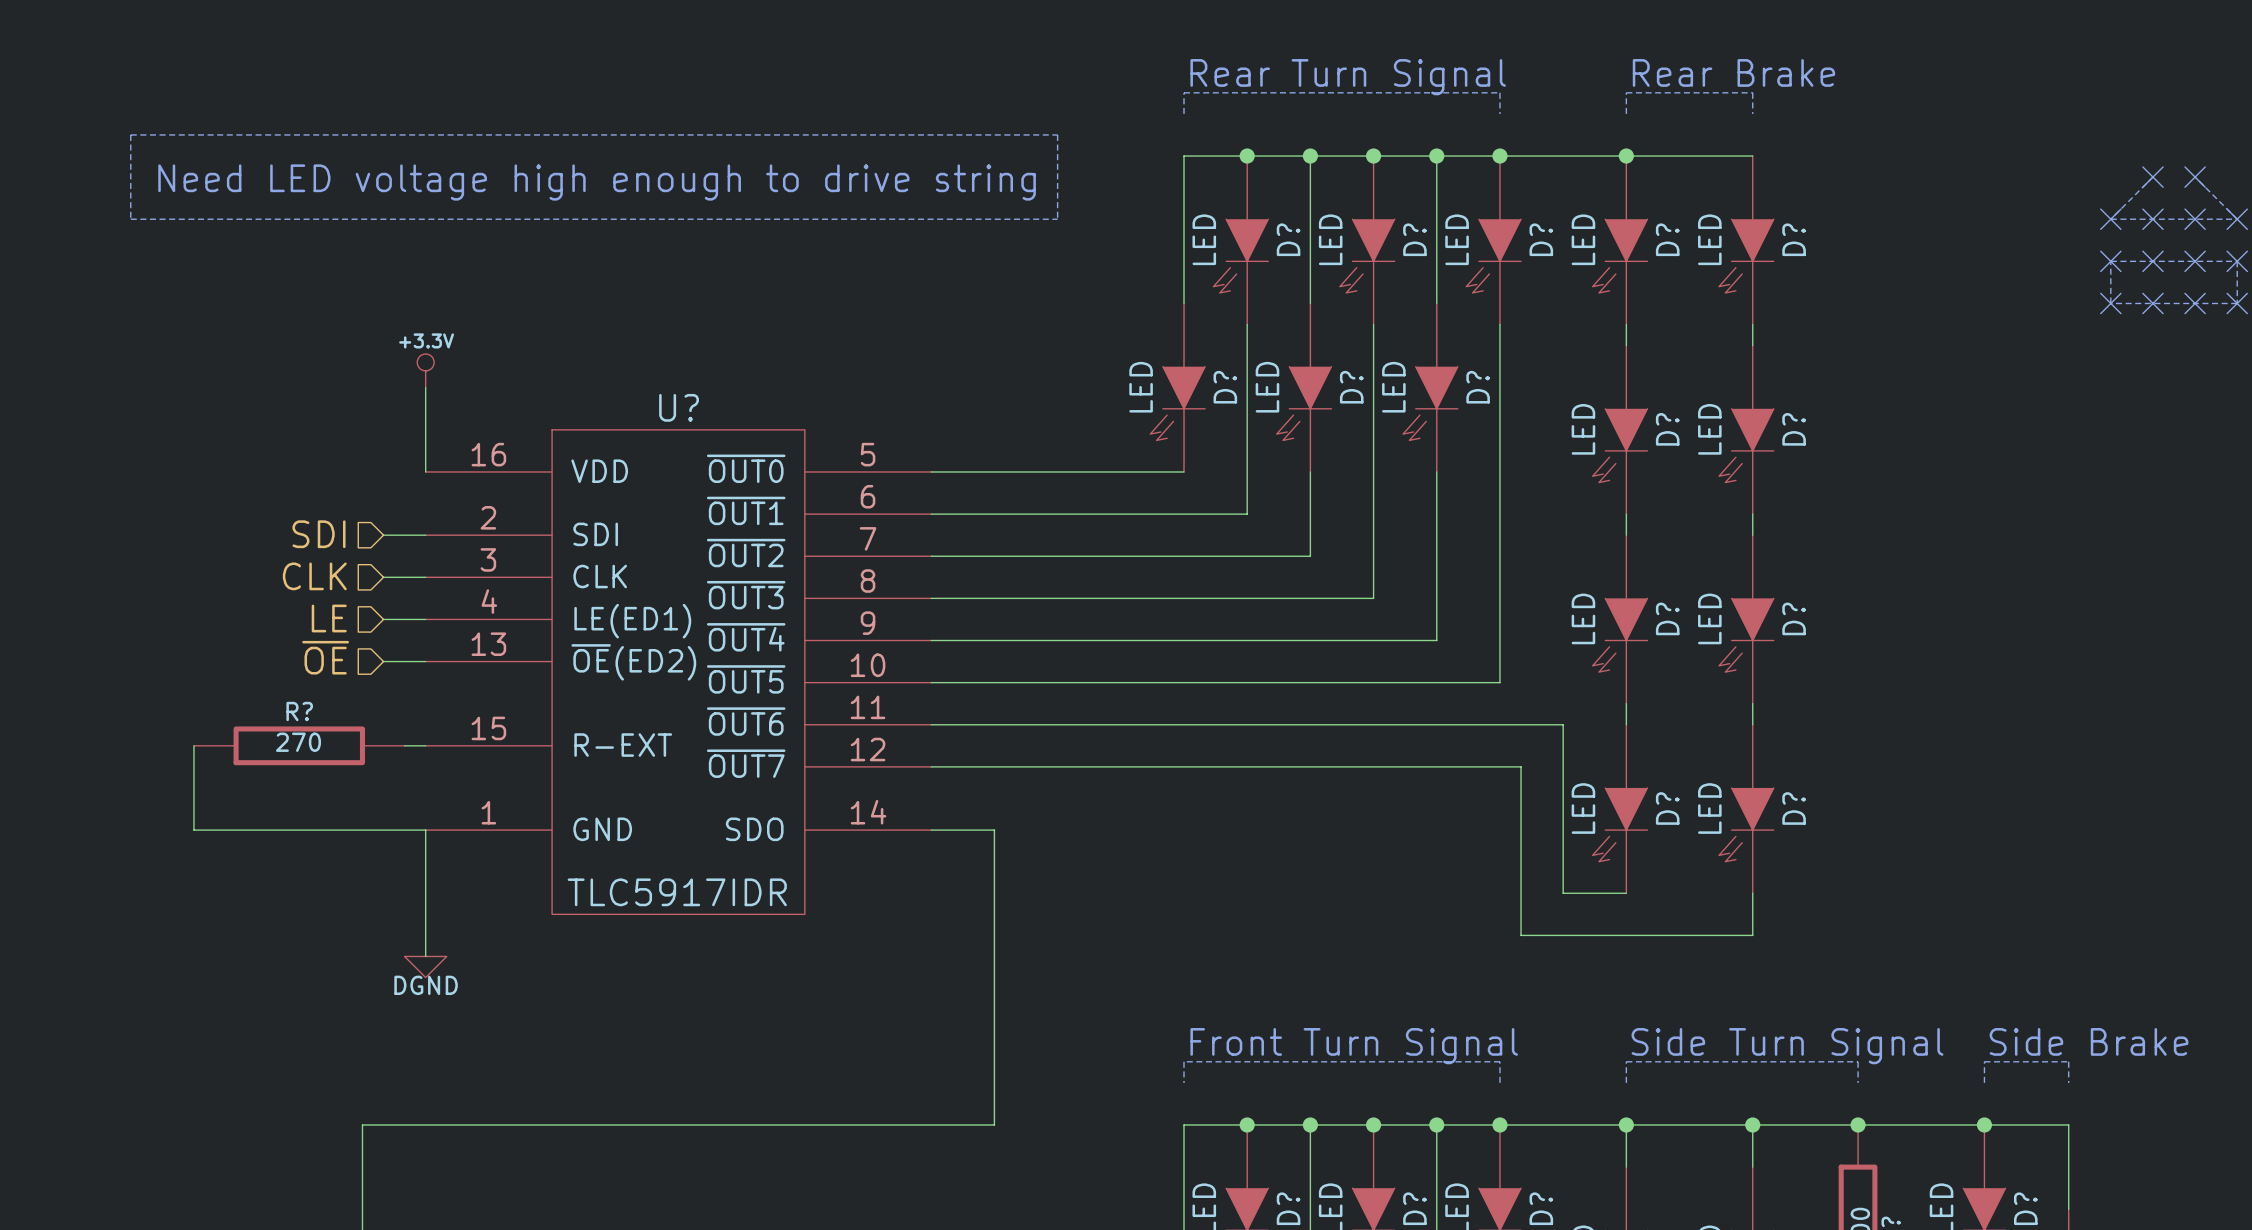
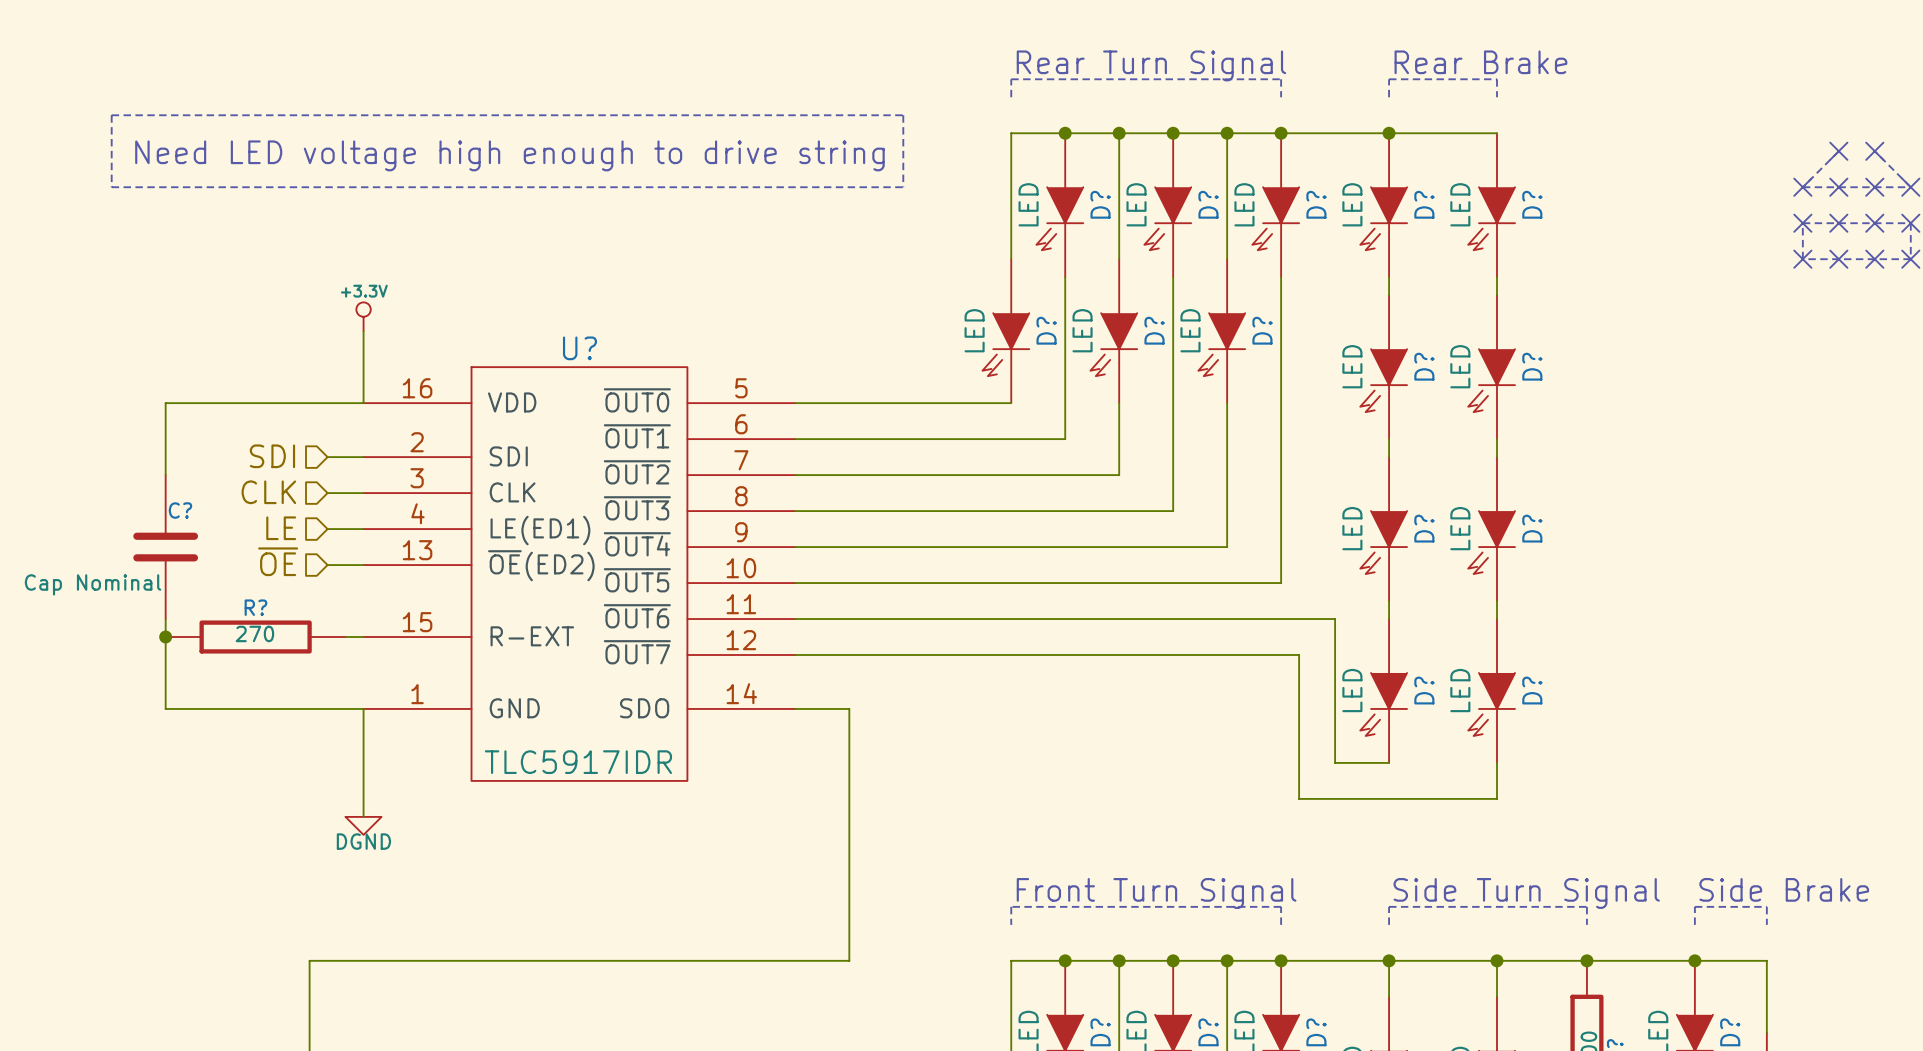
wire: none -> (363, 403) (165, 403) (165, 475)
C?: none -> Cap Nominal (165, 547)
wire: none -> (165, 619) (165, 637)
junction: none -> (165, 637)

